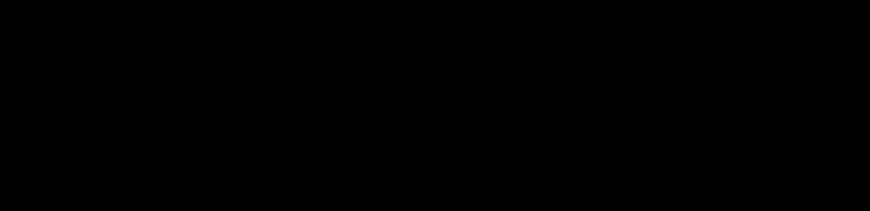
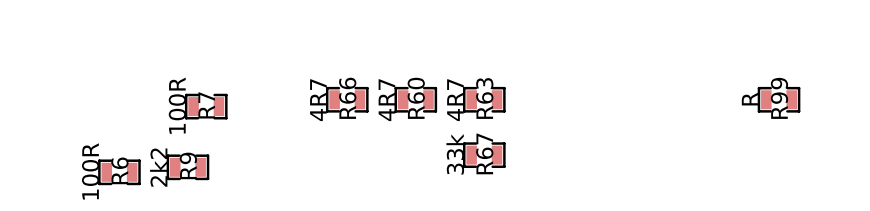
R66: none -> 4R7 (347, 99)
R60: none -> 4R7 (415, 99)
R63: none -> 4R7 (484, 99)
R99: none -> R (779, 99)
R7: none -> 100R (206, 106)
R67: none -> 33k (484, 155)
R9: none -> 2k2 (187, 167)
R6: none -> 100R (119, 172)

